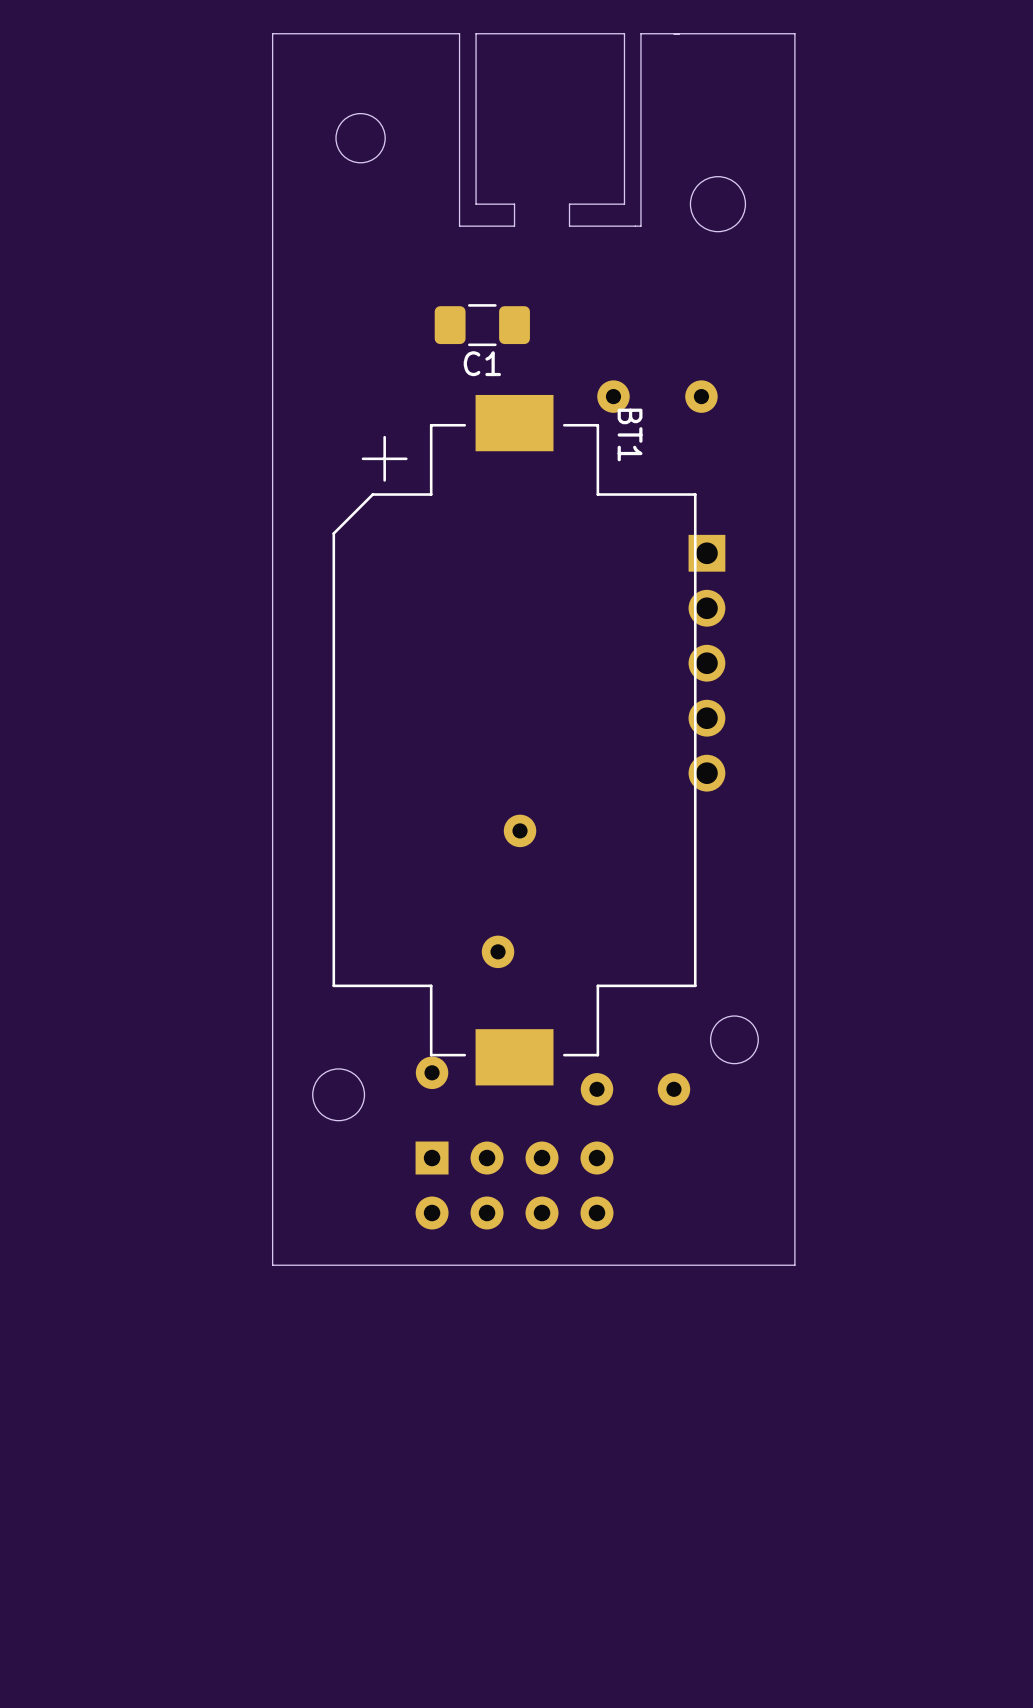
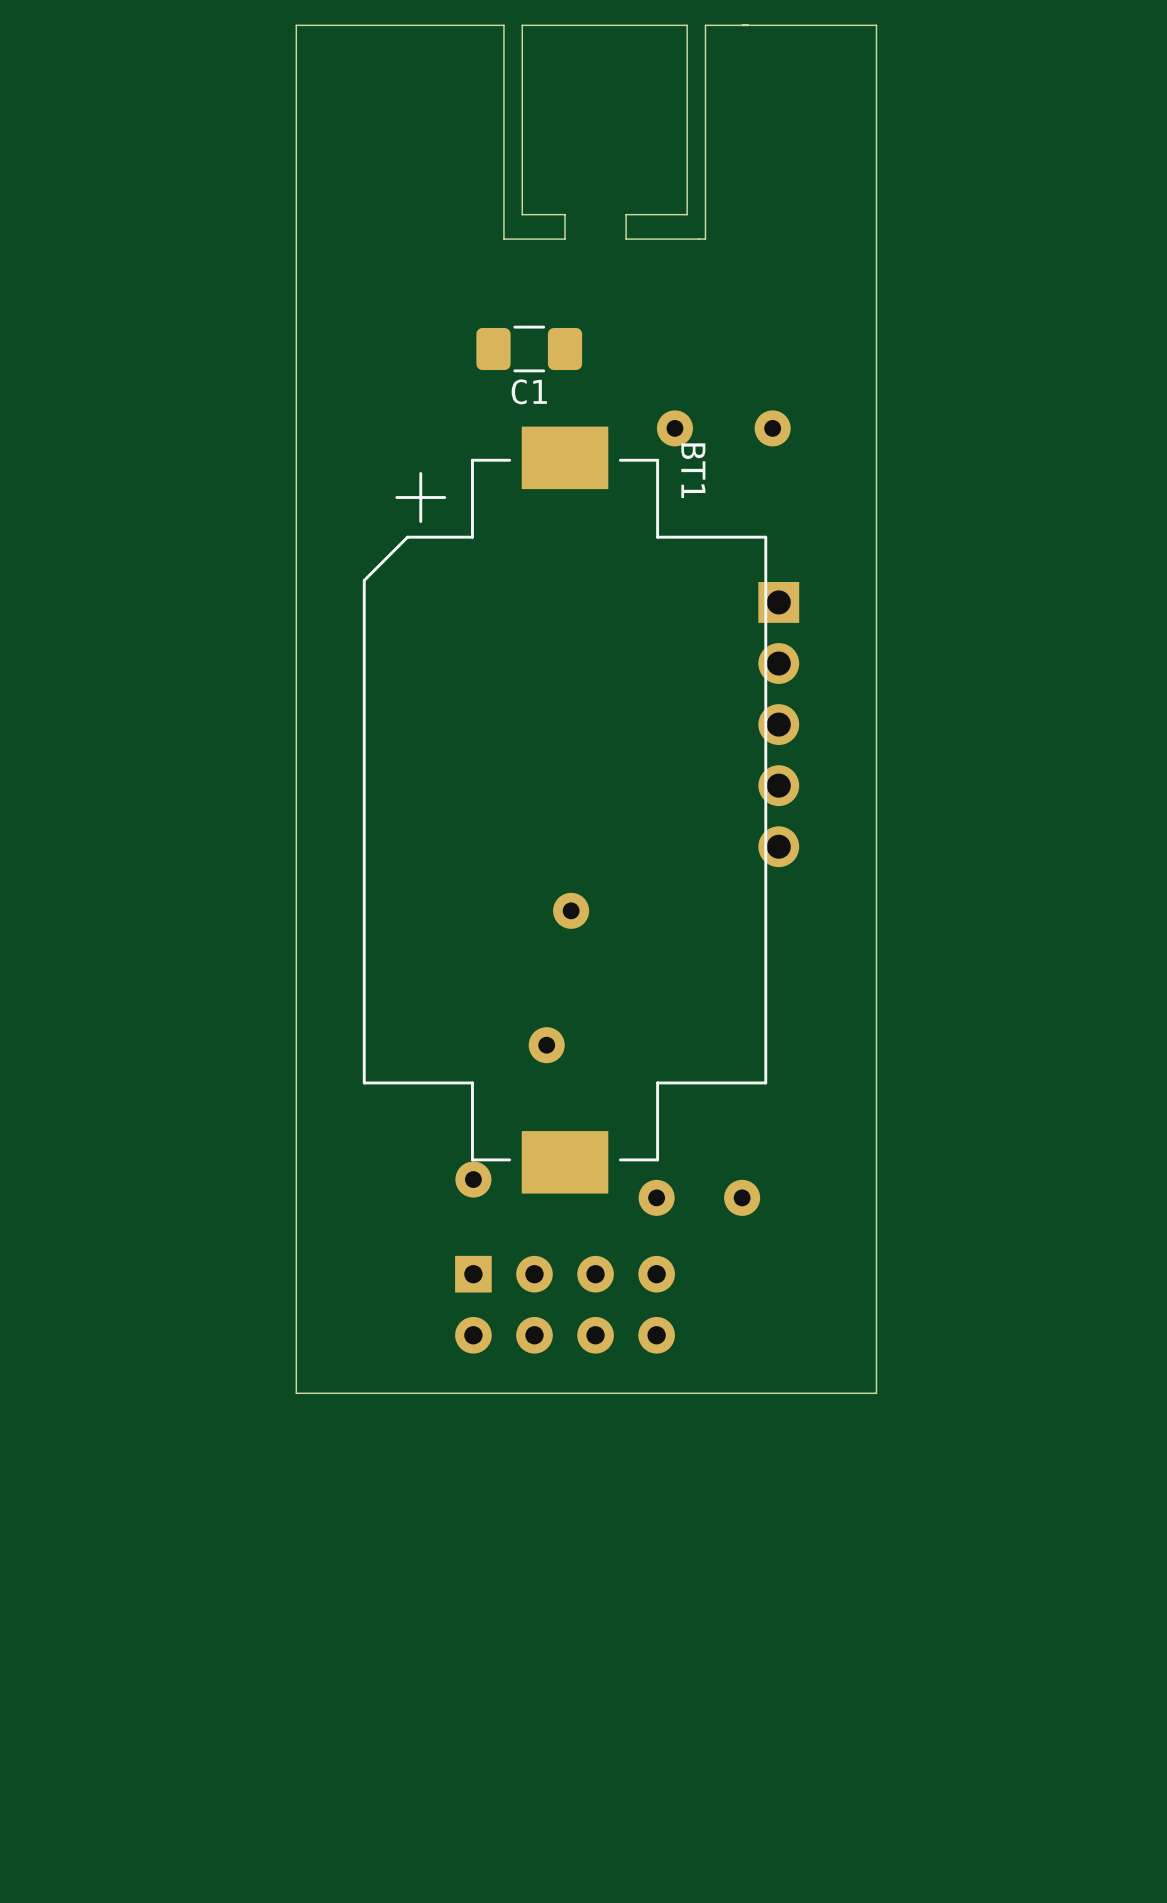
round board edge: [335, 113, 386, 164] -> none
round board edge: [689, 176, 746, 233] -> none
round board edge: [710, 1015, 759, 1065] -> none
round board edge: [312, 1068, 366, 1122] -> none

